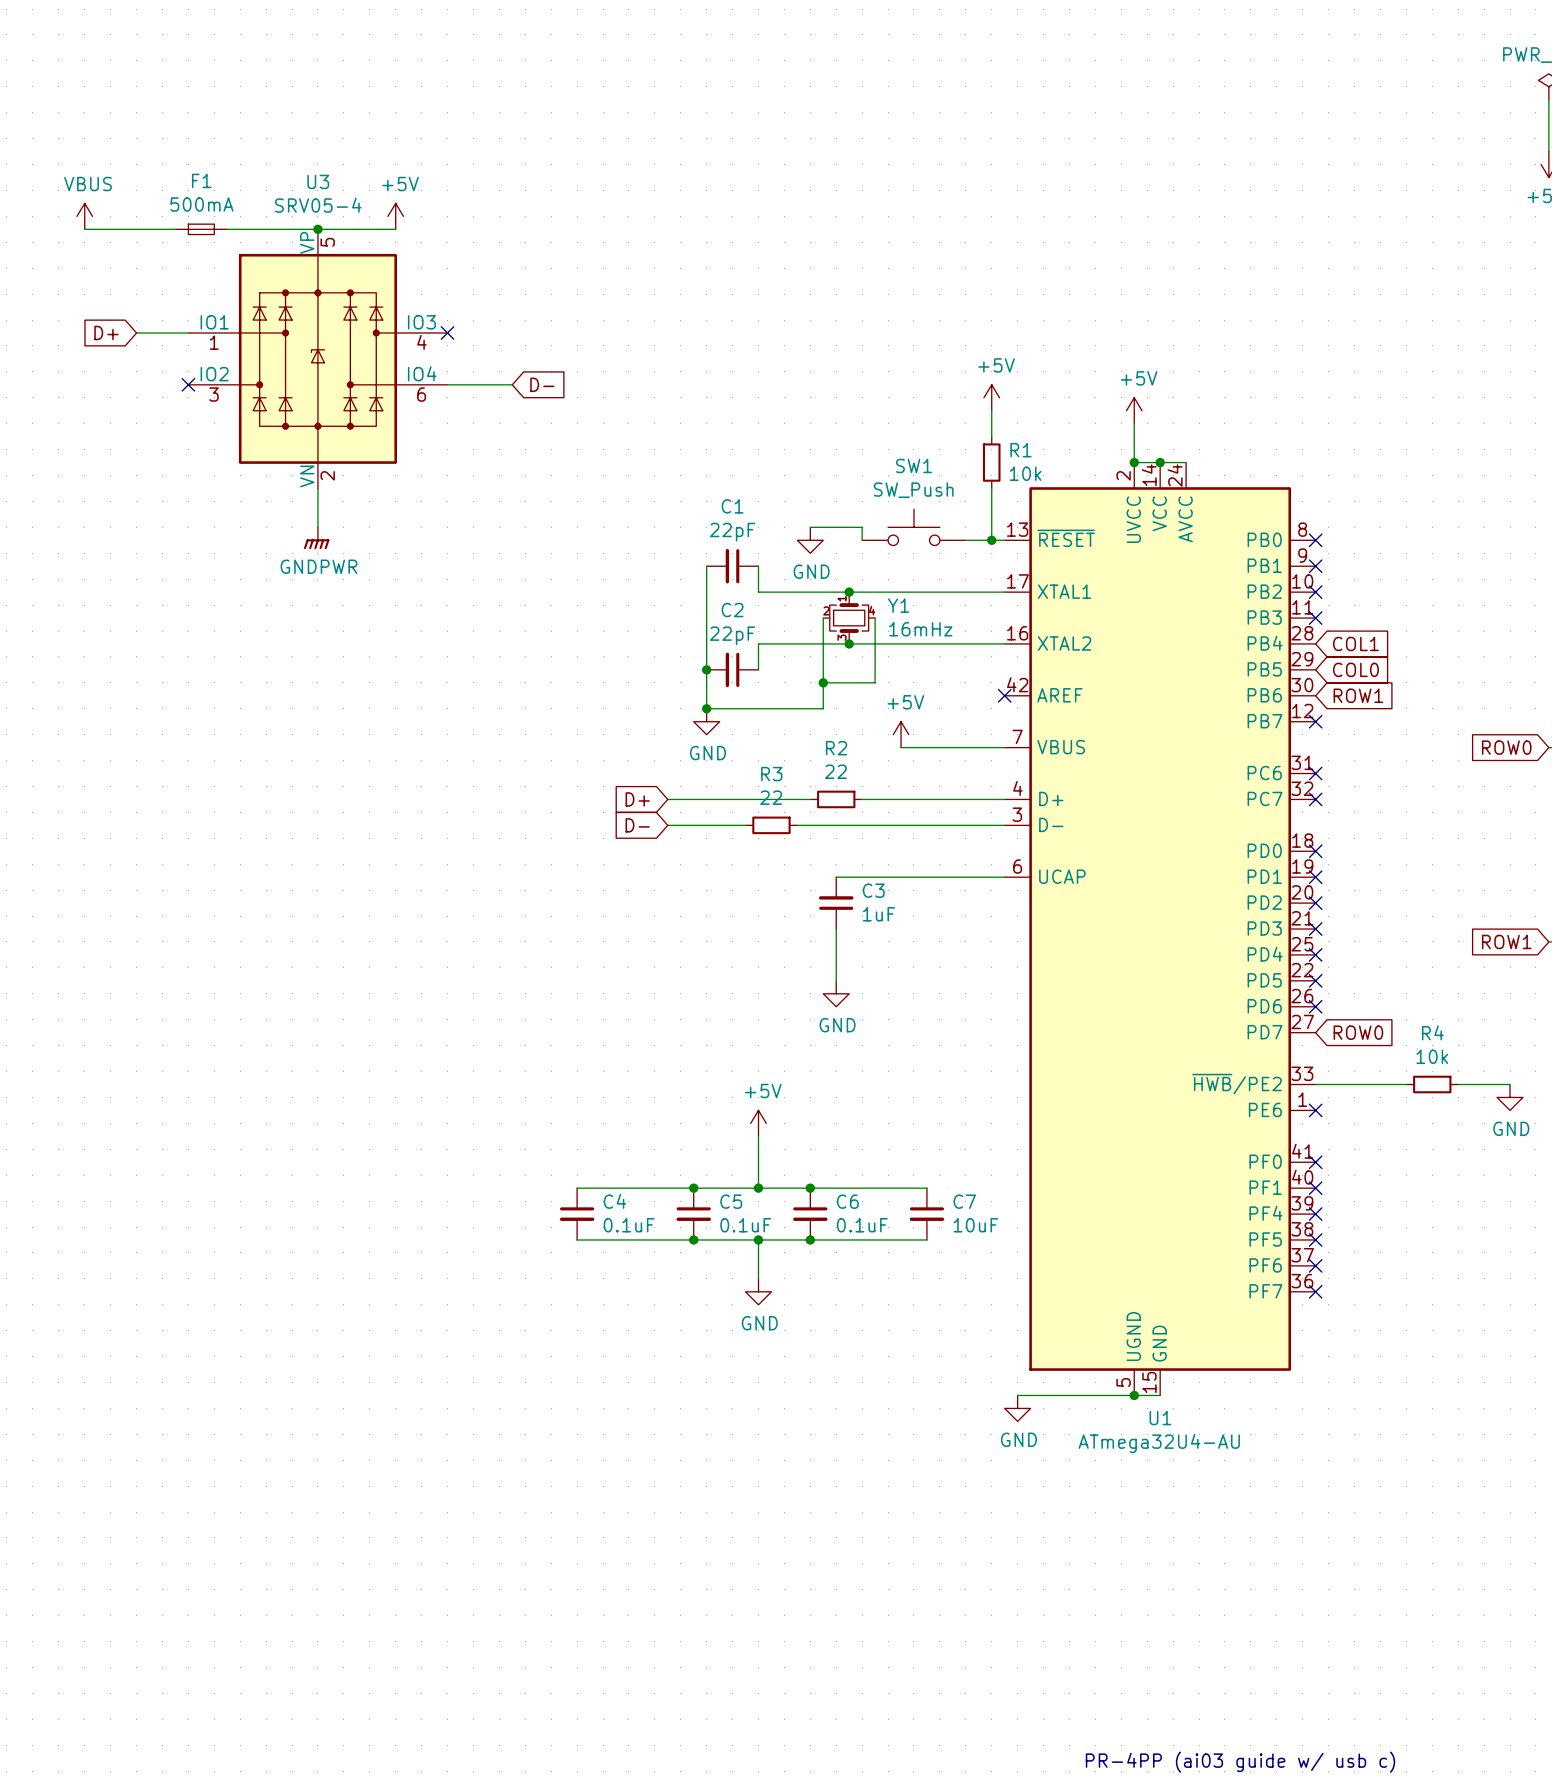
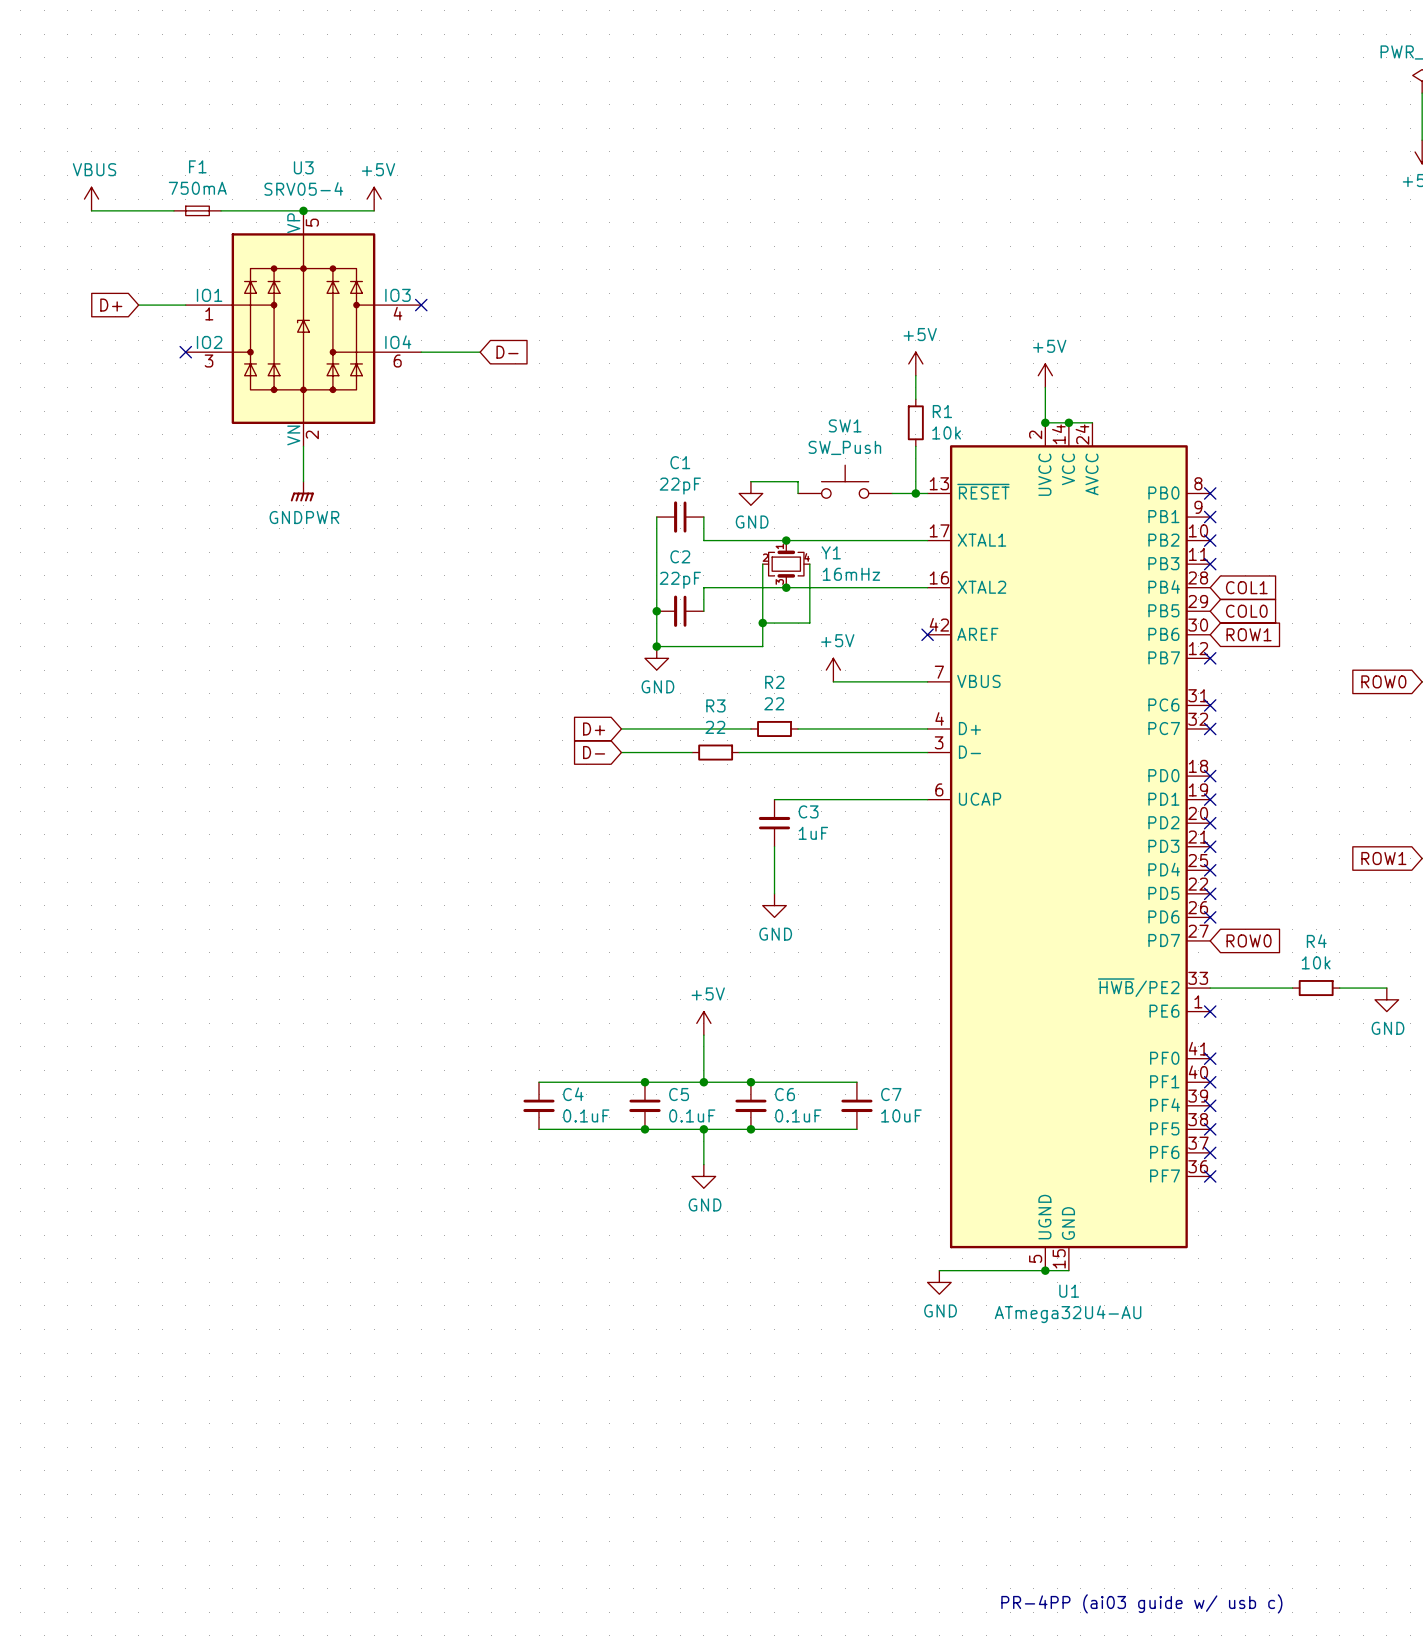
F1 value: 500mA (201, 204) -> 750mA (197, 188)

